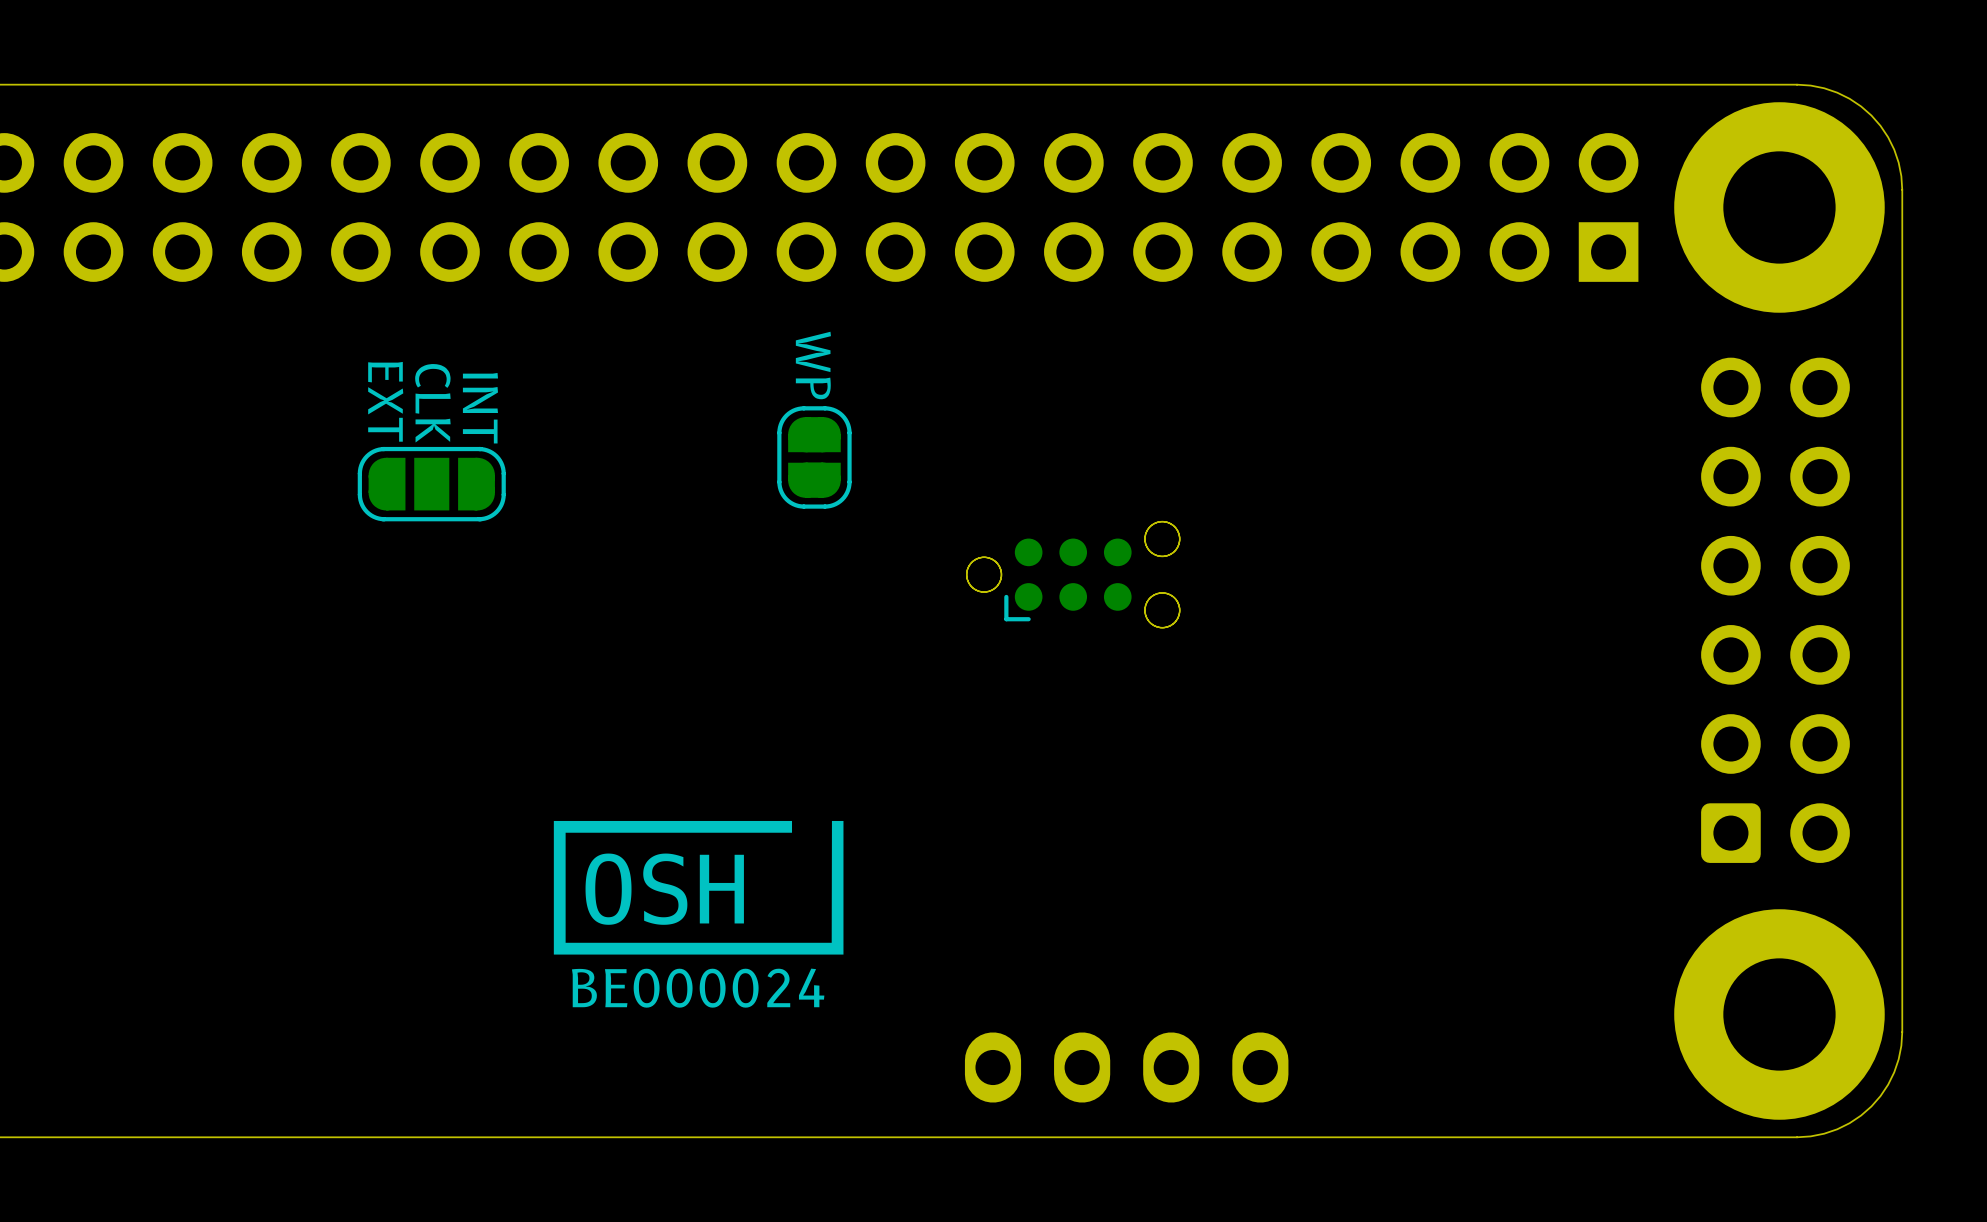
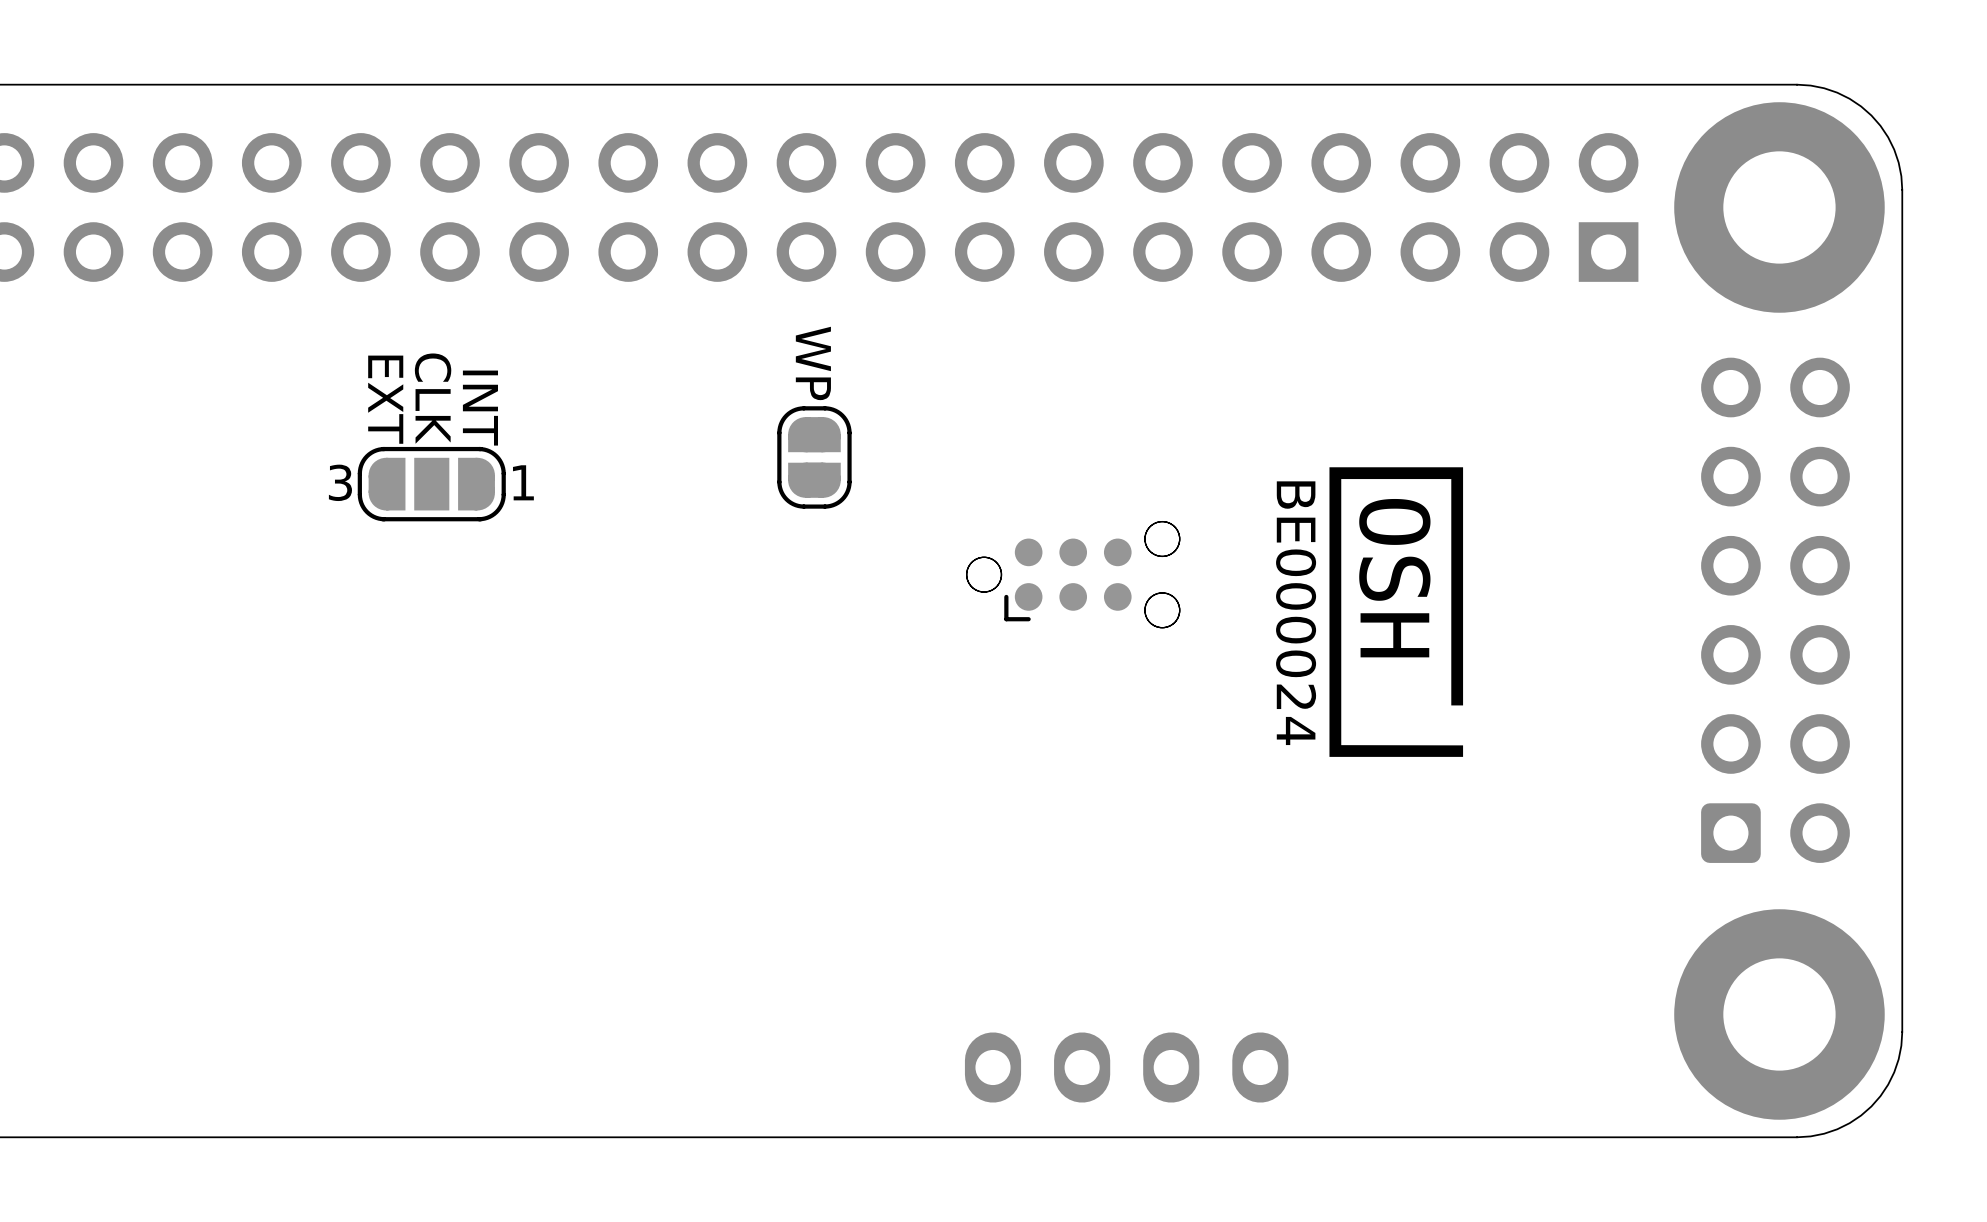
part text: none -> 1 (523, 482)
part text: none -> 3 (340, 482)
BE000024 rotation: 0° (698, 887) -> 90° clockwise (1396, 612)
BE000024 position: (698, 887) -> (1396, 612)

